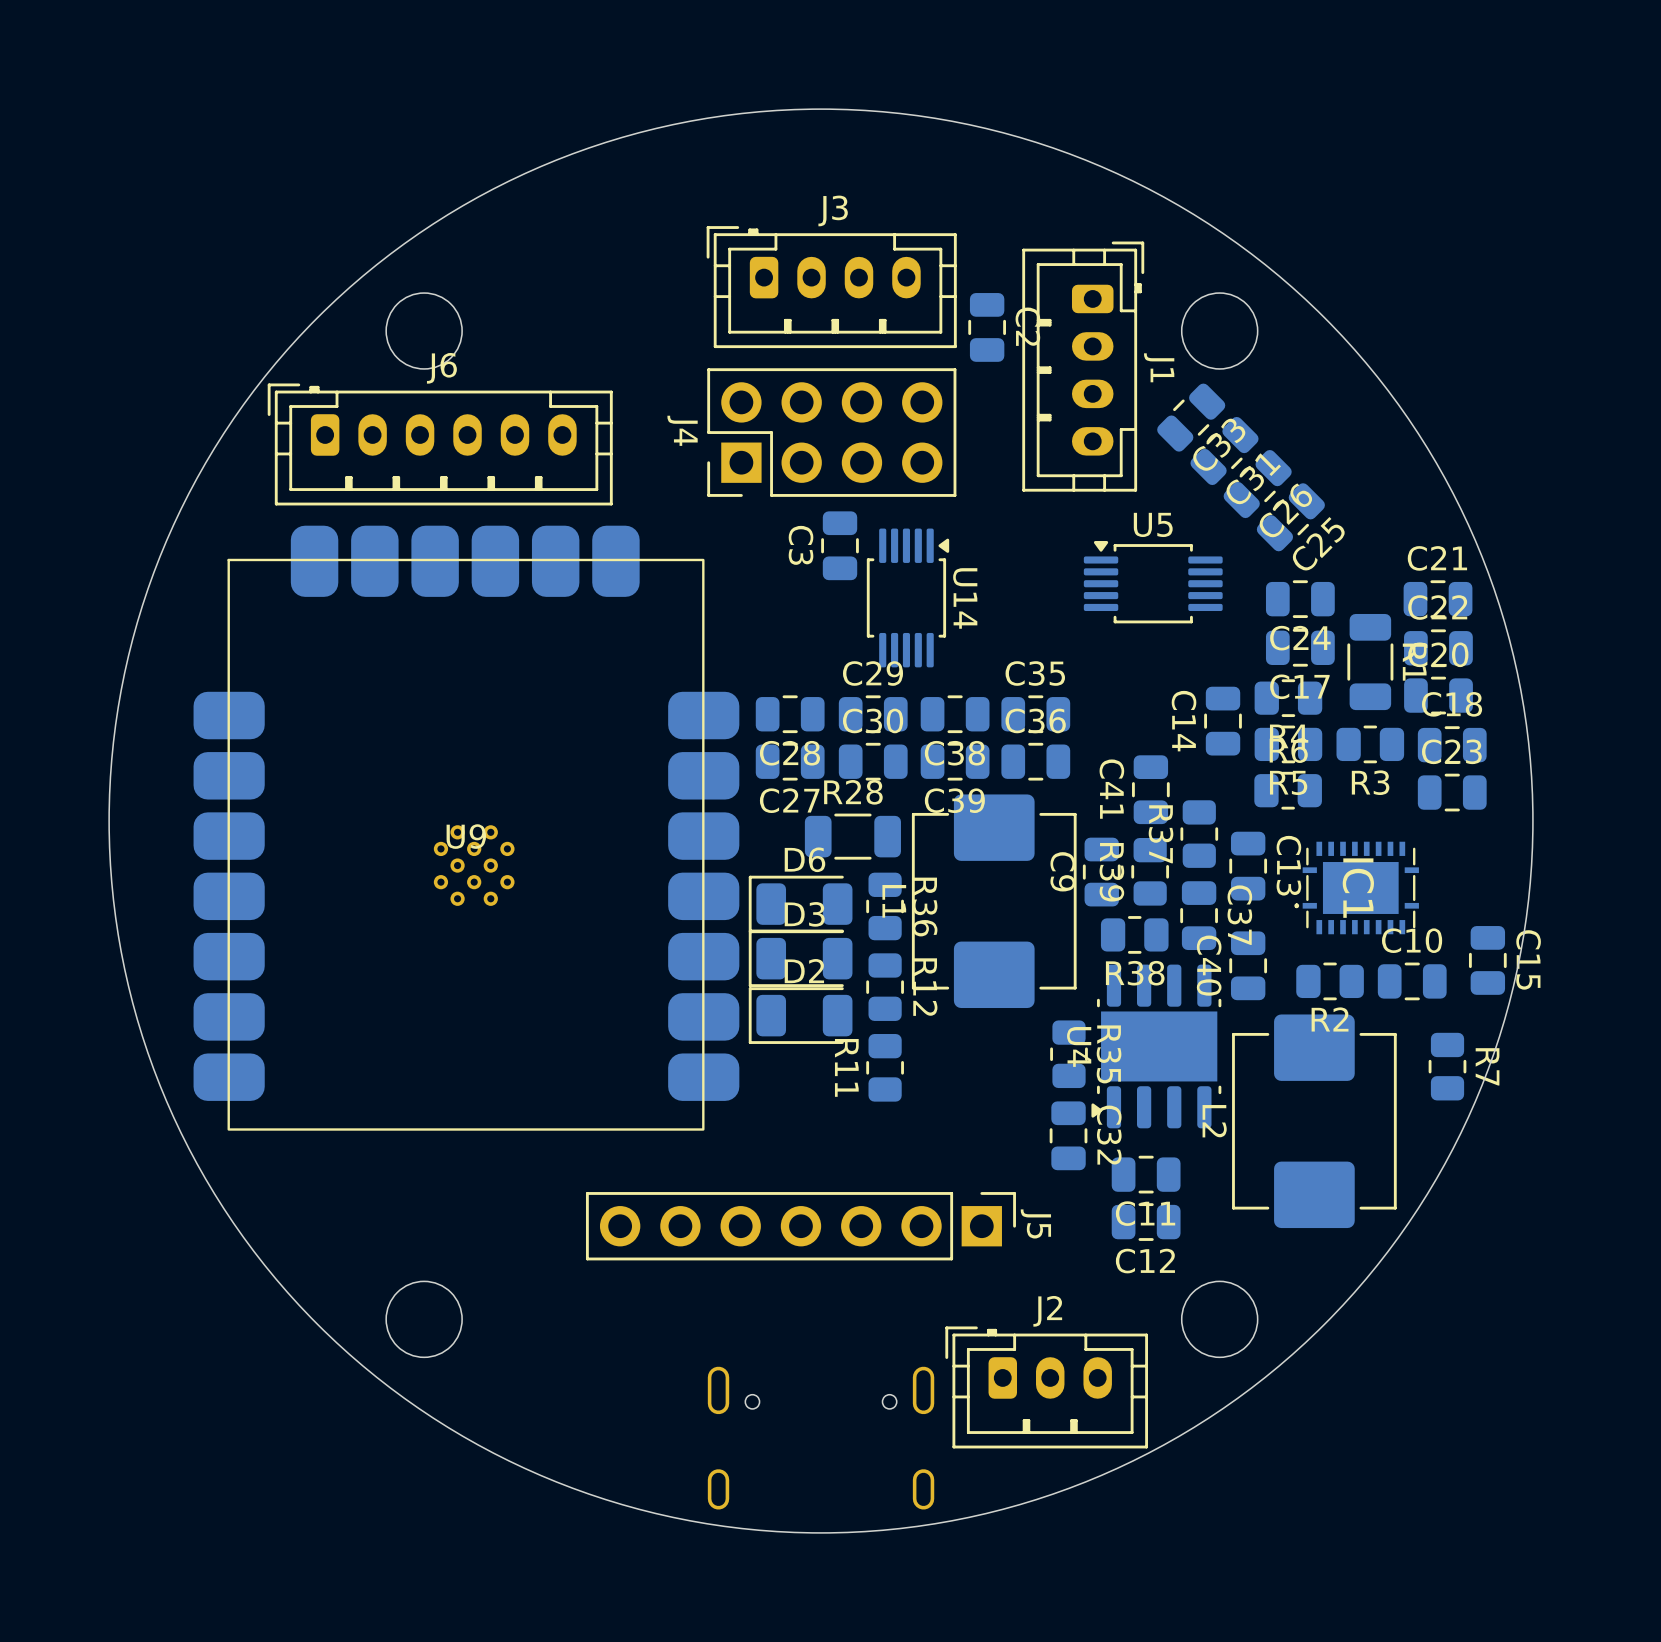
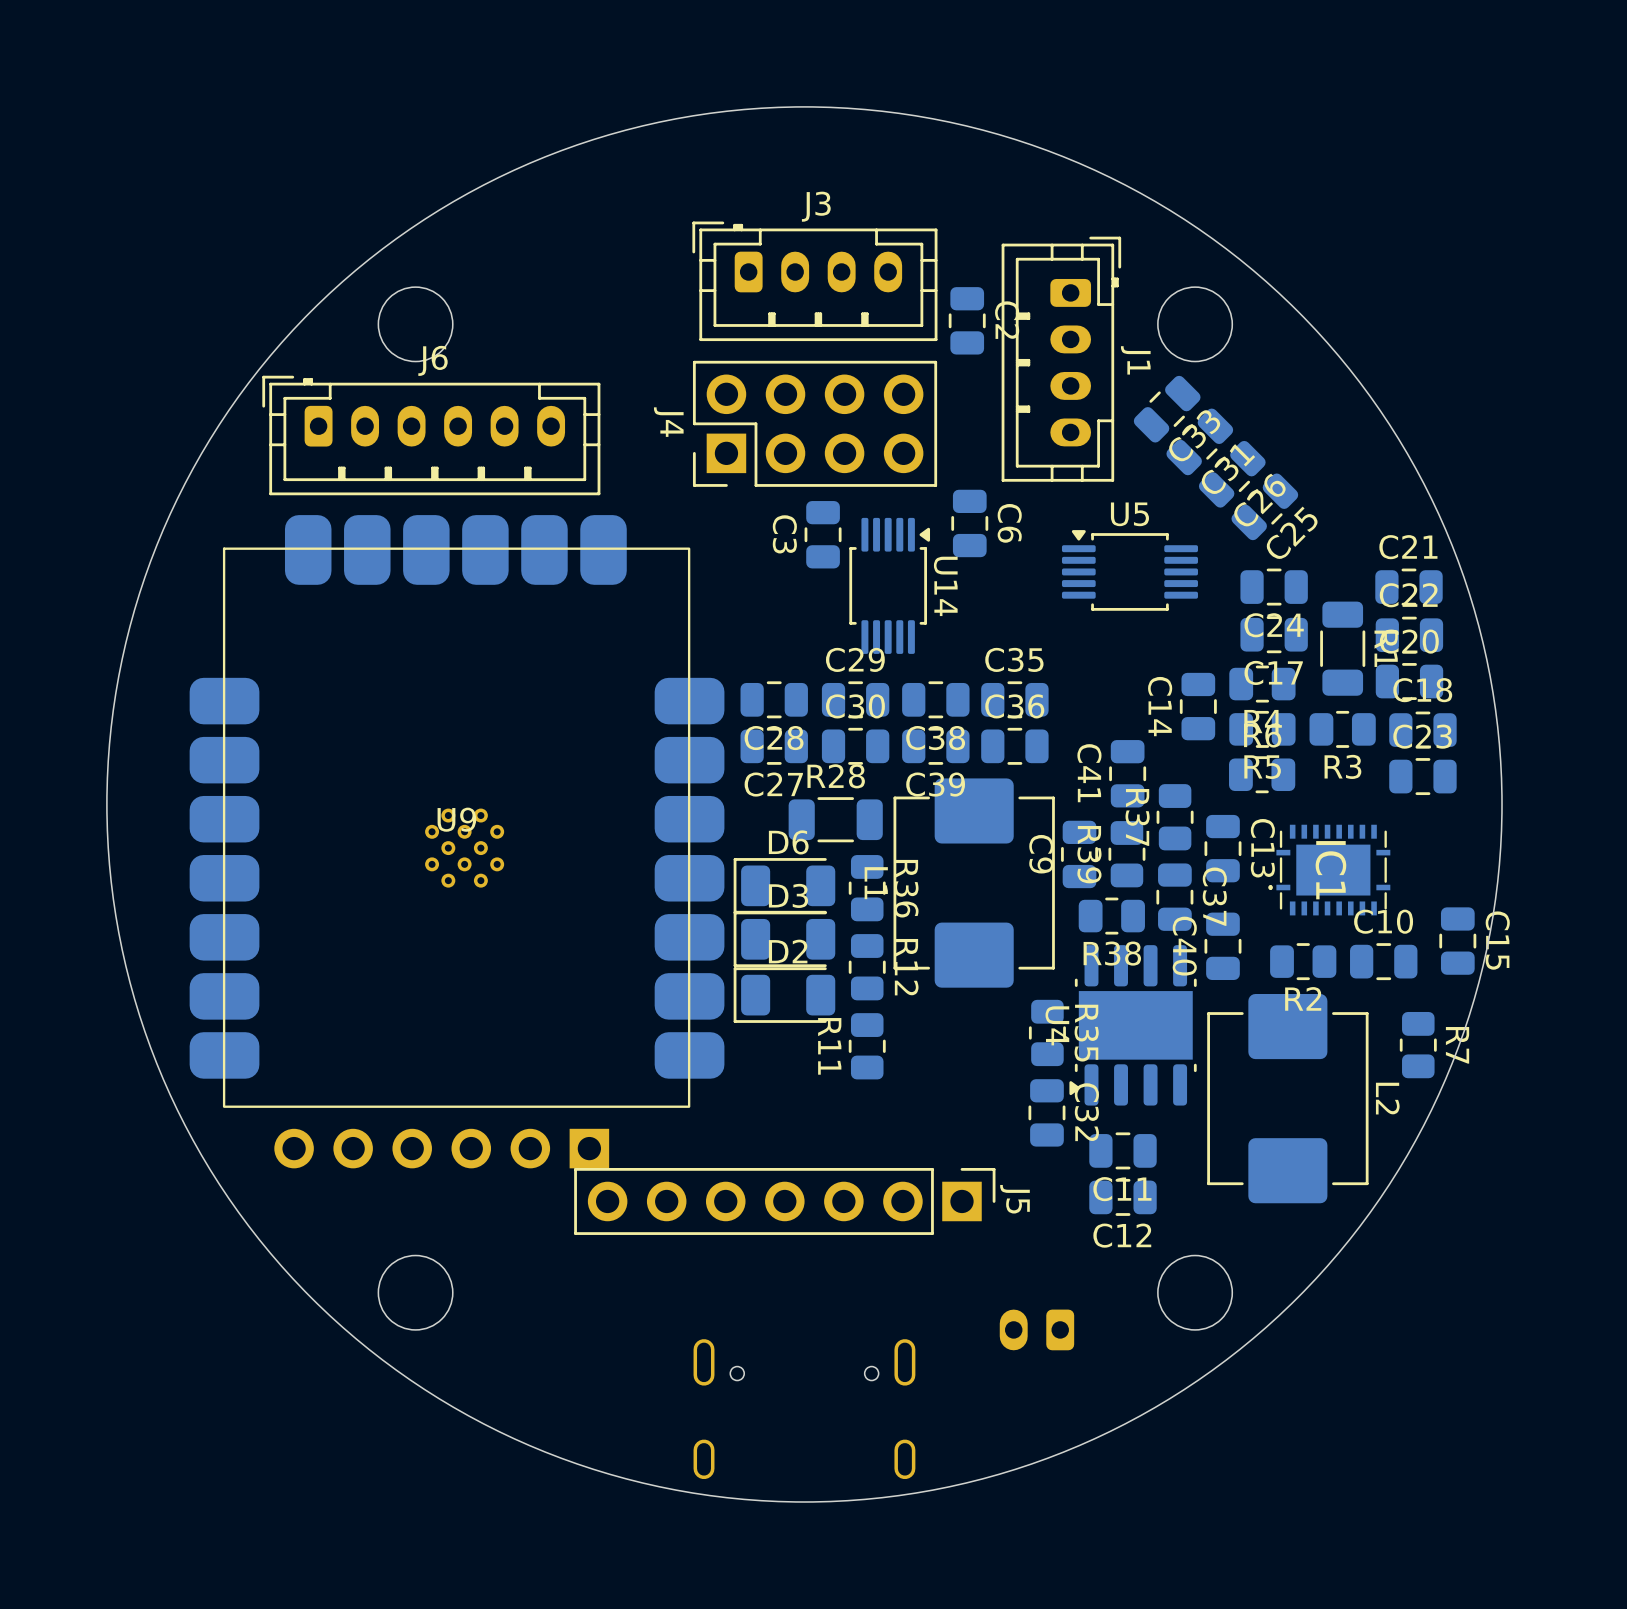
C6: none -> (969, 523)
L2 name position: L2 (1214, 1121) -> L2 (1387, 1098)
part: none -> (441, 1148)
part: none -> (1036, 1329)
J2: (1046, 1387) -> none

